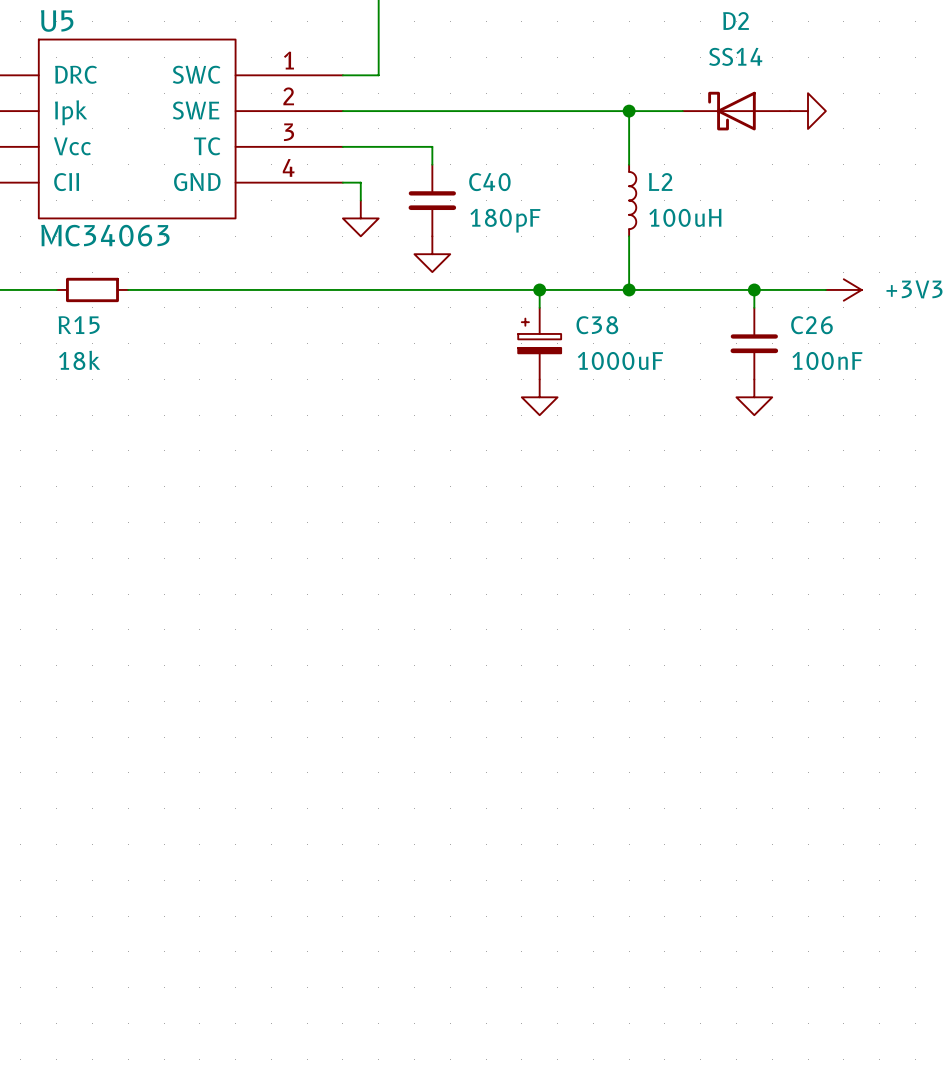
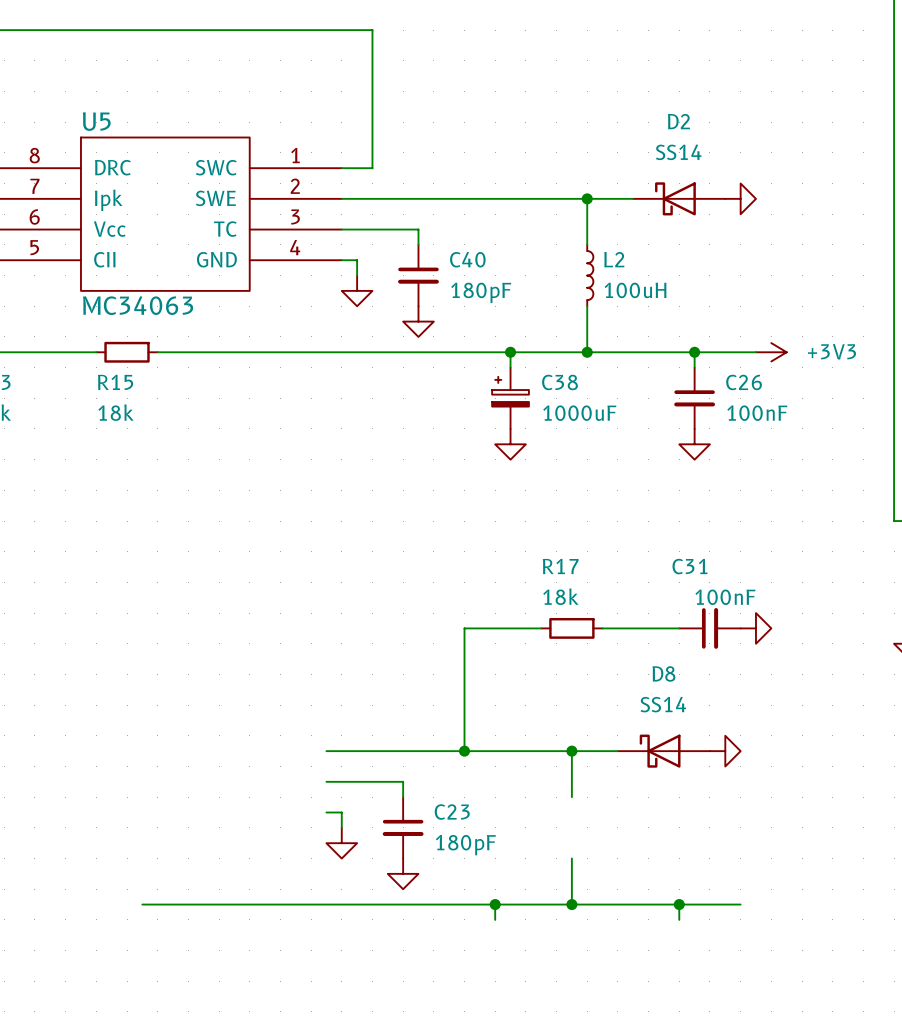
wire: none -> (541, 628) (464, 628) (464, 751)
R17: none -> 18k (571, 628)
wire: none -> (602, 628) (679, 628)
C31: none -> 100nF (709, 628)
power symbol: none -> (755, 628)
wire: none -> (326, 751) (617, 751)
junction: none -> (464, 751)
wire: none -> (571, 751) (571, 797)
junction: none -> (571, 751)
D8: none -> SS14 (663, 751)
power symbol: none -> (725, 751)
wire: none -> (326, 781) (403, 781) (403, 797)
wire: none -> (326, 812) (341, 812) (341, 827)
C23: none -> 180pF (403, 827)
power symbol: none -> (341, 843)
wire: none -> (571, 858) (571, 904)
power symbol: none -> (403, 873)
wire: none -> (142, 904) (740, 904)
wire: none -> (495, 904) (495, 919)
junction: none -> (495, 904)
junction: none -> (571, 904)
wire: none -> (679, 904) (679, 919)
junction: none -> (679, 904)

